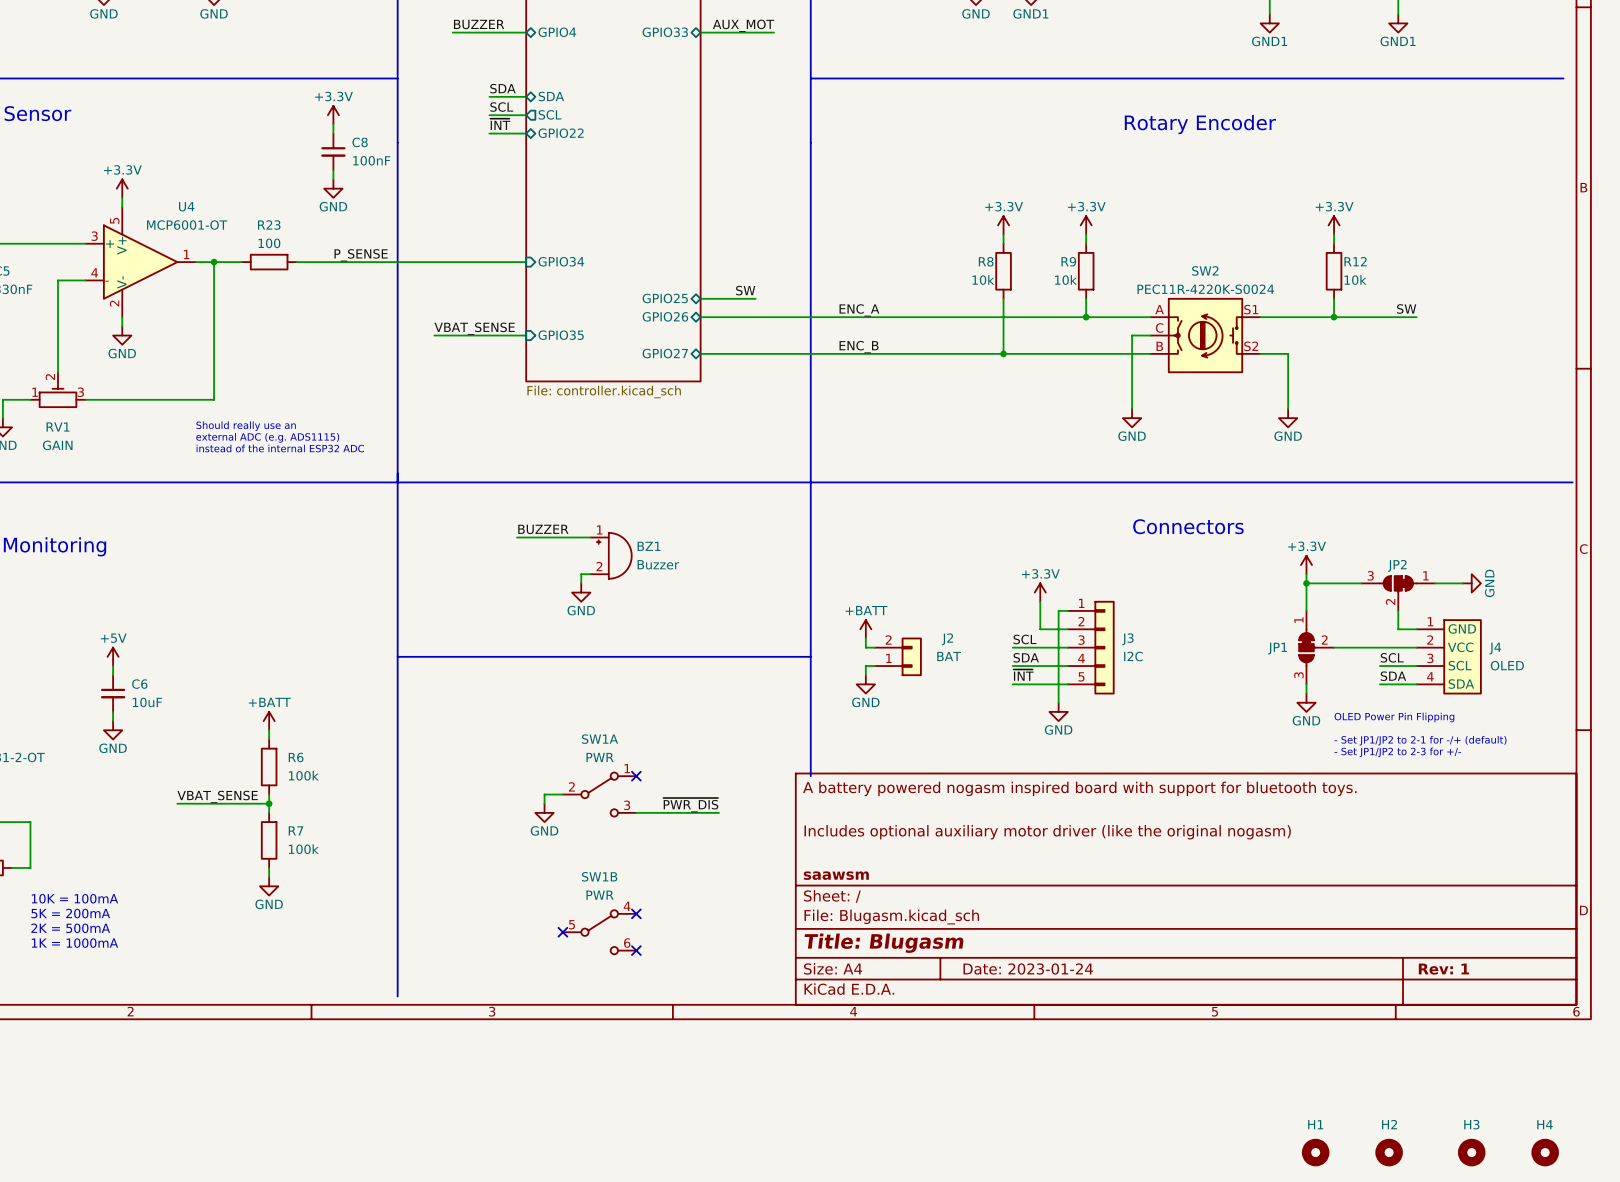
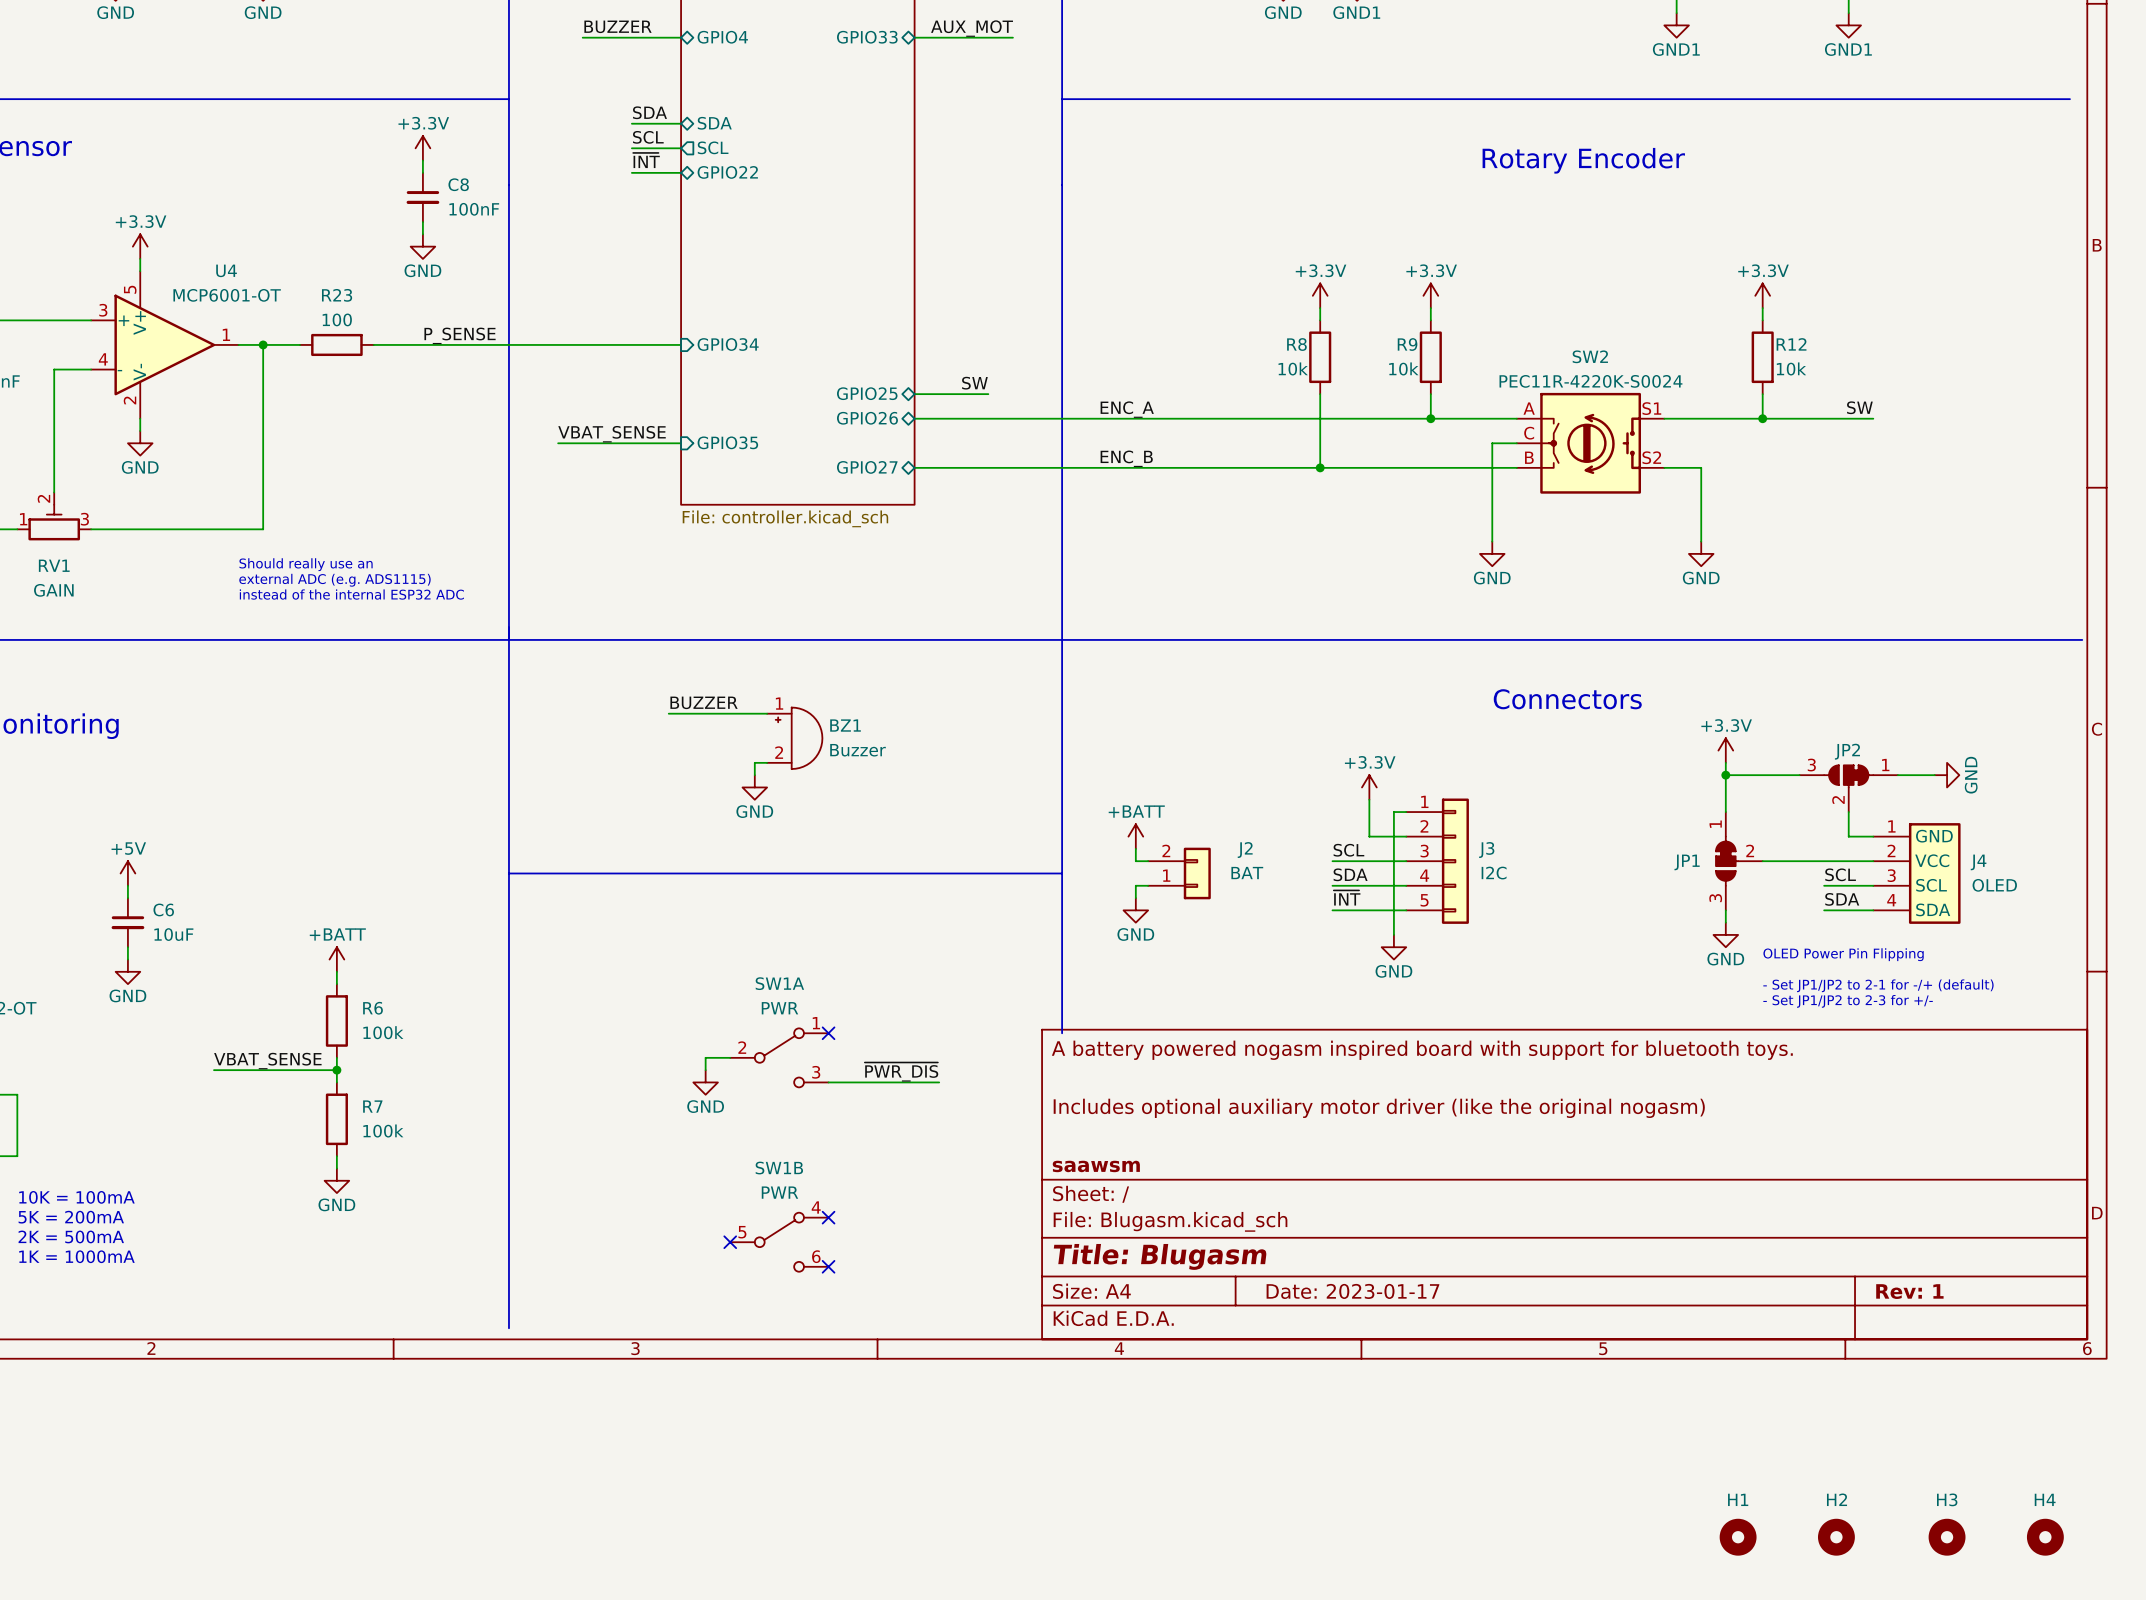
title block: Date: 2023-01-24 (1028, 969) -> Date: 2023-01-17 (1352, 1291)

